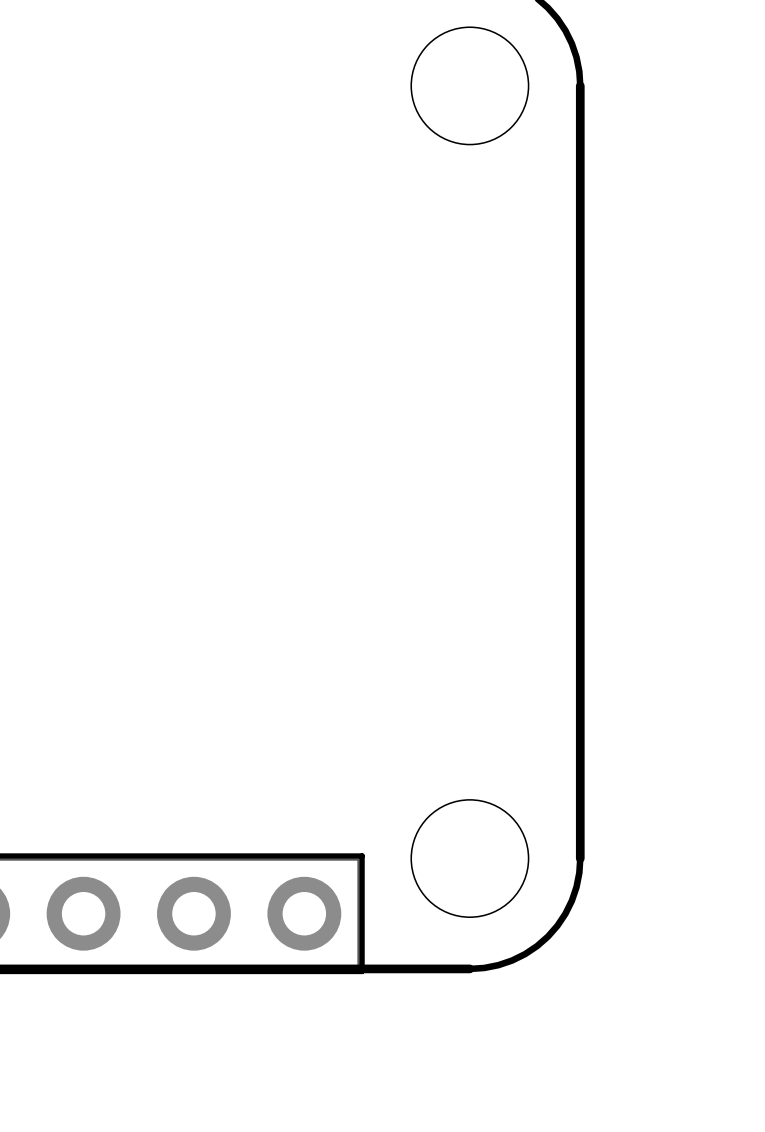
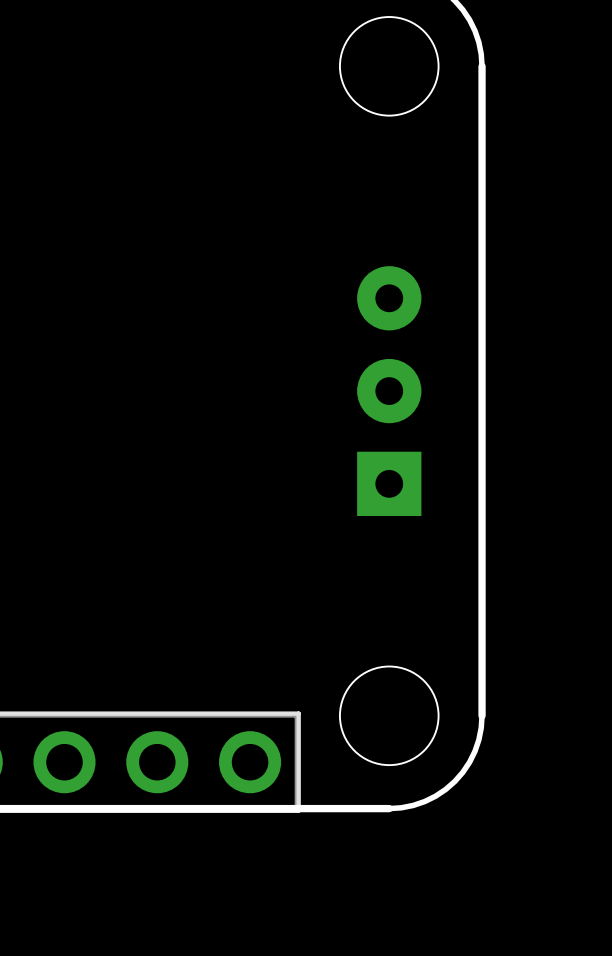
part: none -> (389, 391)

